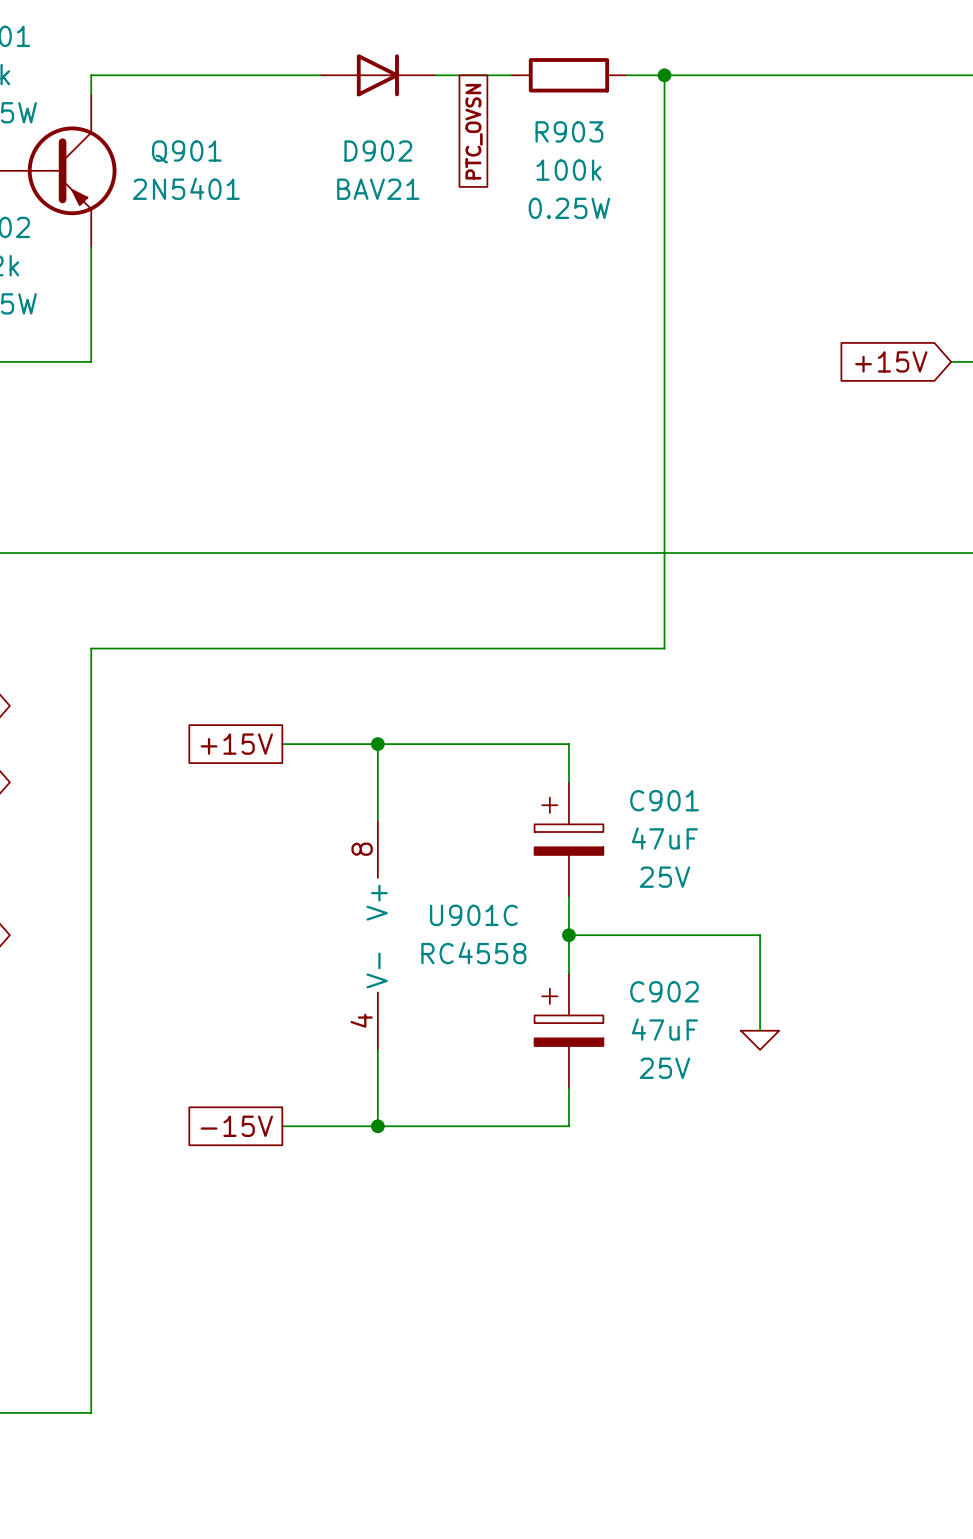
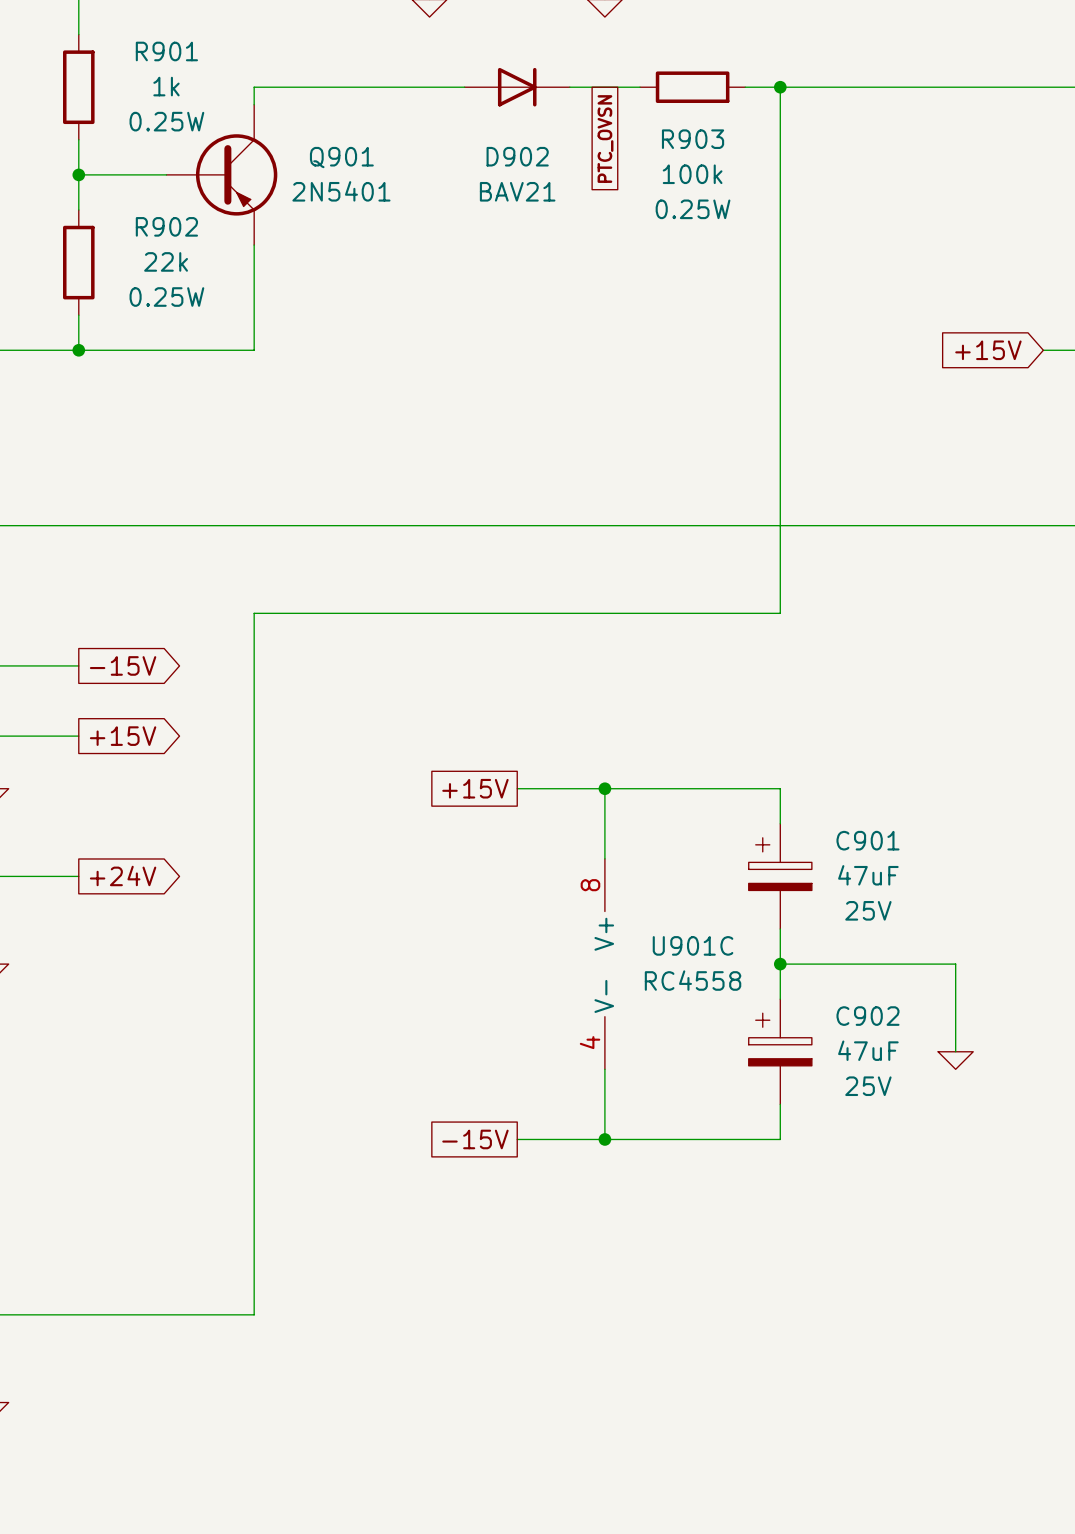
global label position: +15V (236, 744) -> +15V (475, 788)
wire: (282, 744) (568, 744) (568, 782) -> (517, 788) (780, 788) (780, 823)
wire: (377, 744) (377, 820) -> (604, 788) (604, 858)
junction: (377, 744) -> none
junction: none -> (604, 788)
C901 position: (568, 839) -> (780, 876)
wire: (568, 896) (568, 973) -> (780, 929) (780, 999)
U901C position: (377, 935) -> (604, 964)
wire: (568, 935) (760, 935) (760, 1030) -> (780, 964) (955, 964) (955, 1051)
junction: (568, 935) -> none
C902 position: (568, 1030) -> (780, 1051)
junction: none -> (780, 964)
power symbol position: (760, 1040) -> (955, 1060)
wire: (377, 1049) (377, 1126) -> (604, 1069) (604, 1139)
wire: (568, 1088) (568, 1126) (282, 1126) -> (780, 1104) (780, 1139) (517, 1139)
global label position: -15V (236, 1126) -> -15V (475, 1139)
junction: (377, 1126) -> none
junction: none -> (604, 1139)

